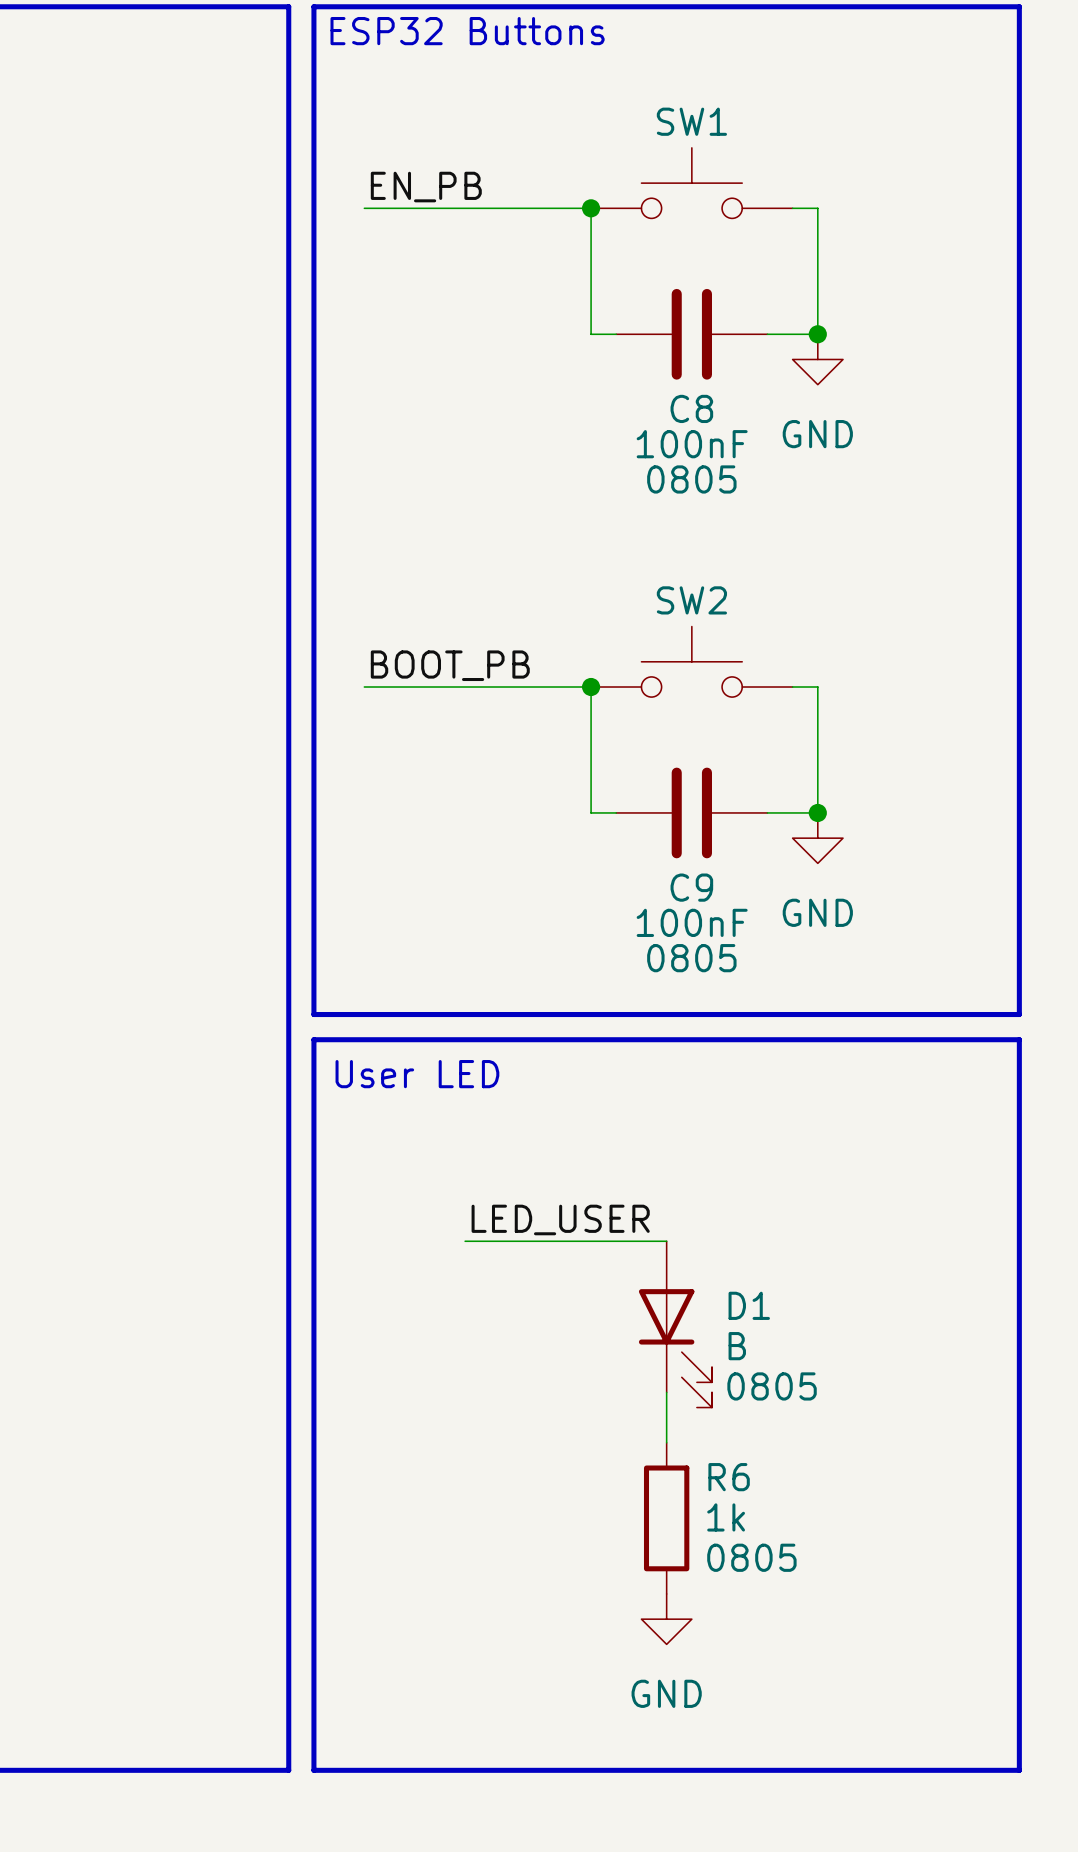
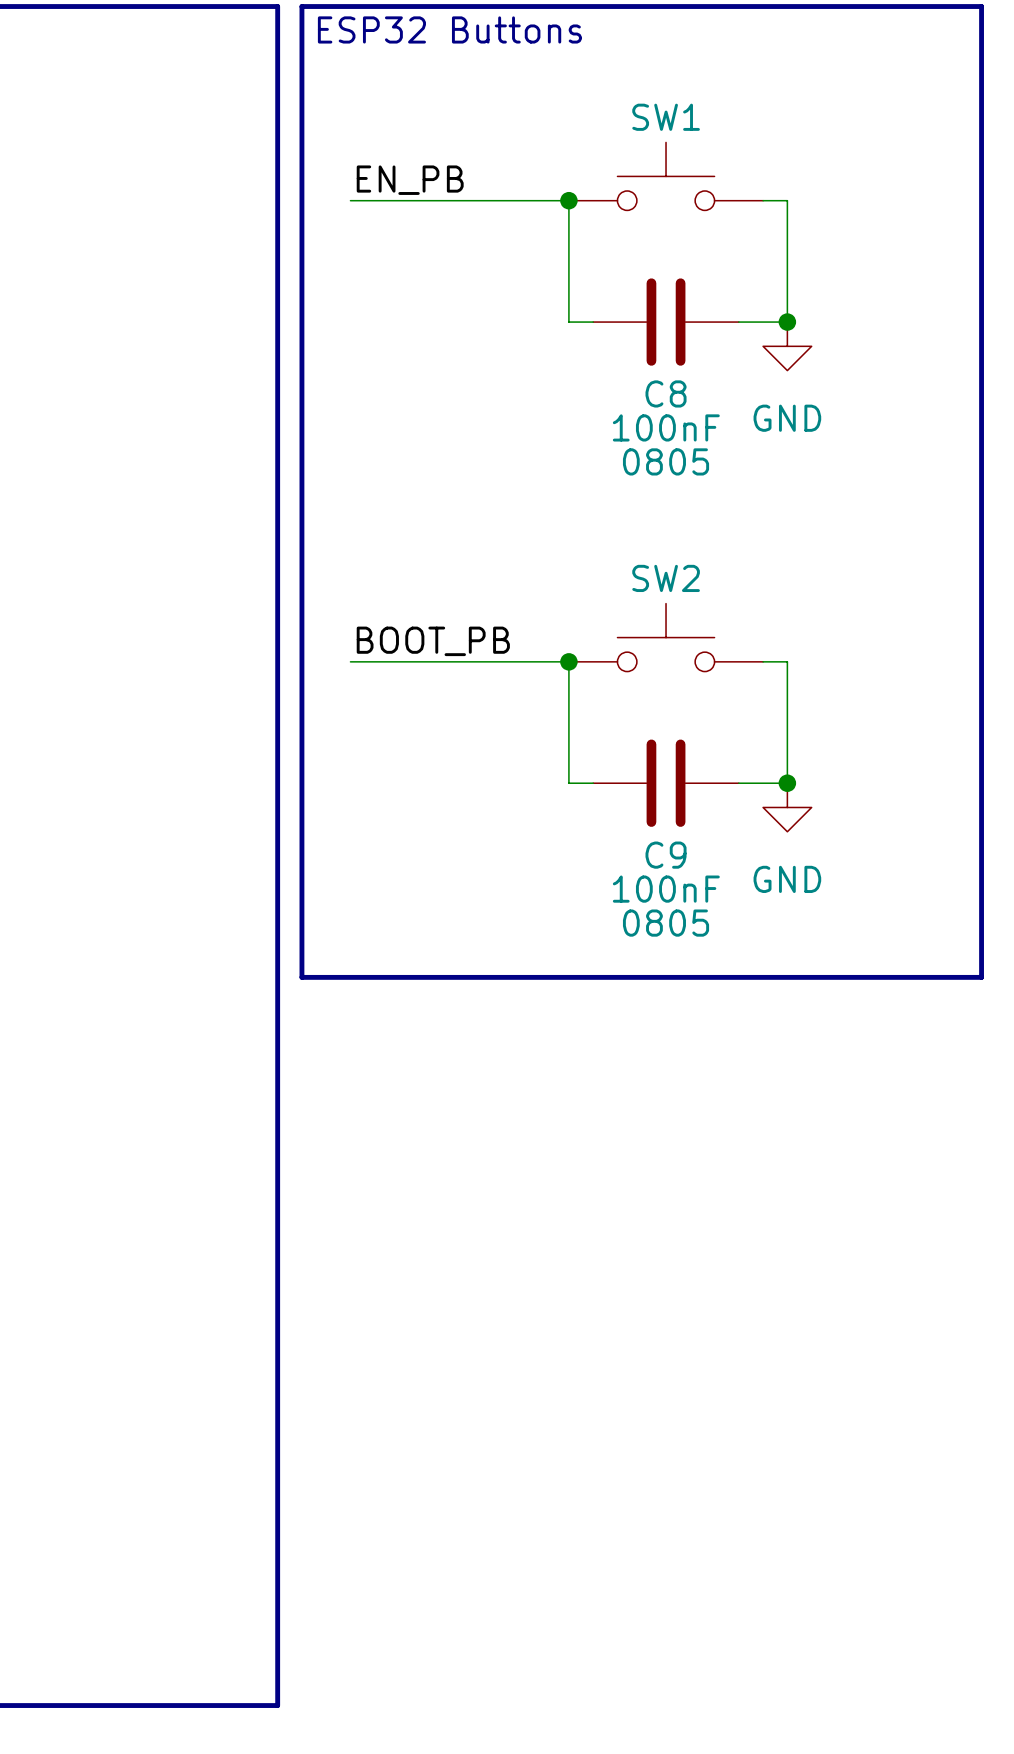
line: (313, 1039) (1019, 1039) (1019, 1770) (313, 1770) (313, 1039) -> none
text: User LED (417, 1074) -> none
label: LED_USER (560, 1219) -> none
wire: (465, 1241) (666, 1241) -> none
D1: B (675, 1324) -> none
wire: (666, 1392) (666, 1442) -> none
R6: 1k (666, 1518) -> none
power symbol: GND (666, 1619) -> none

